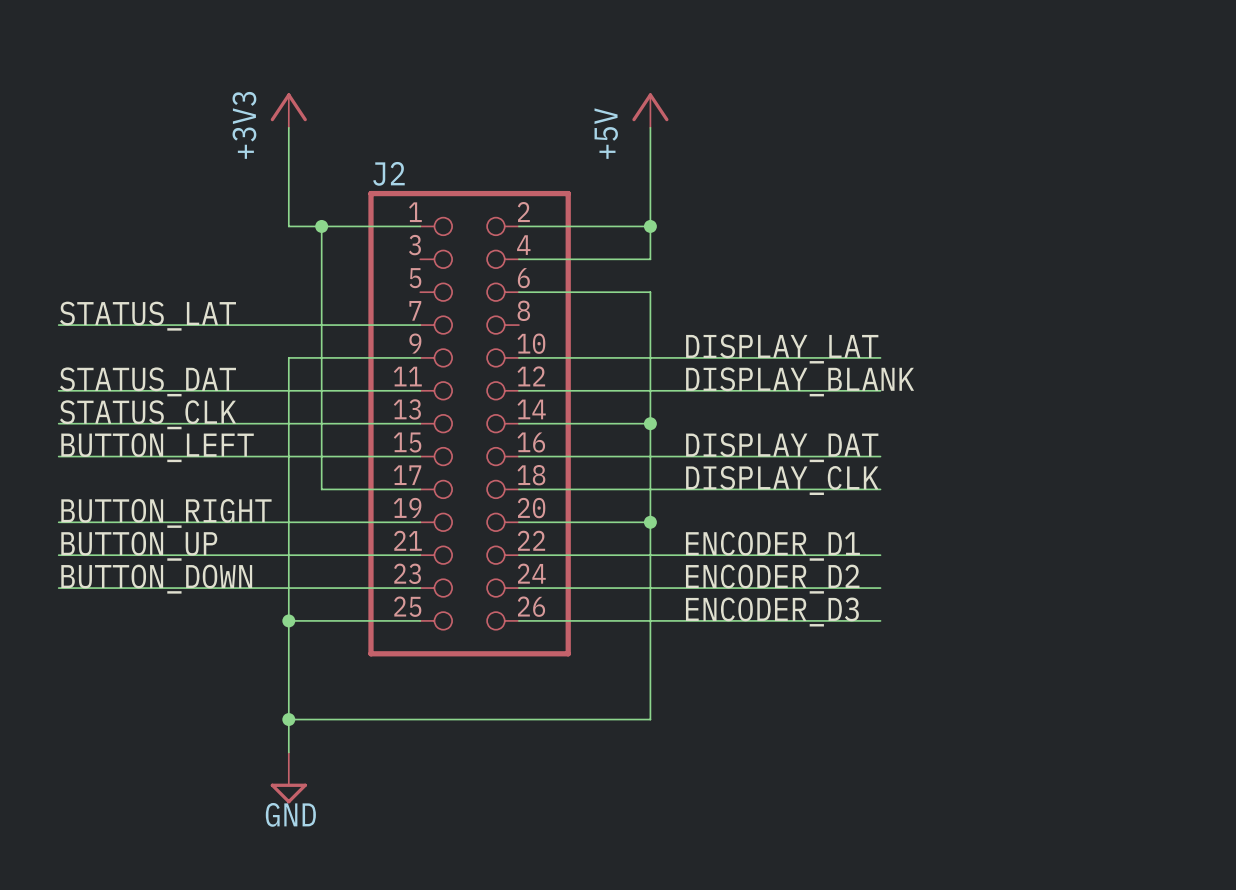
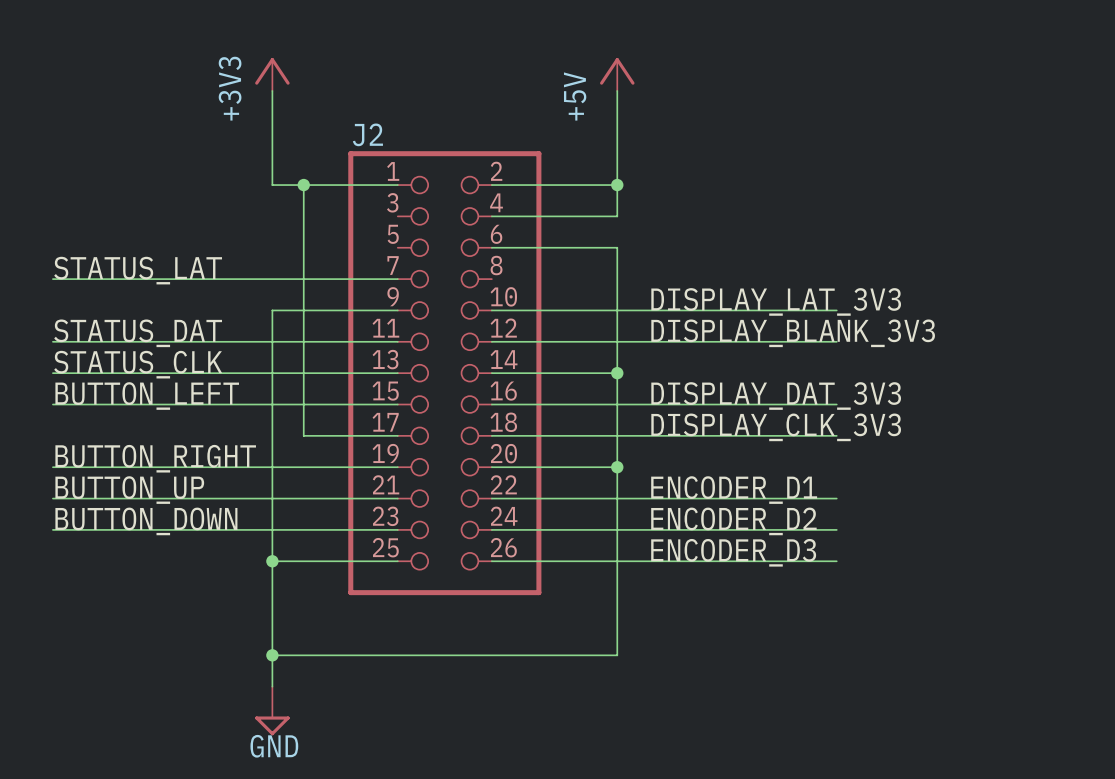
label: DISPLAY_LAT (782, 349) -> DISPLAY_LAT_3V3 (776, 301)
label: DISPLAY_BLANK (800, 381) -> DISPLAY_BLANK_3V3 (793, 333)
label: DISPLAY_DAT (782, 447) -> DISPLAY_DAT_3V3 (776, 396)
label: DISPLAY_CLK (782, 480) -> DISPLAY_CLK_3V3 (776, 427)

